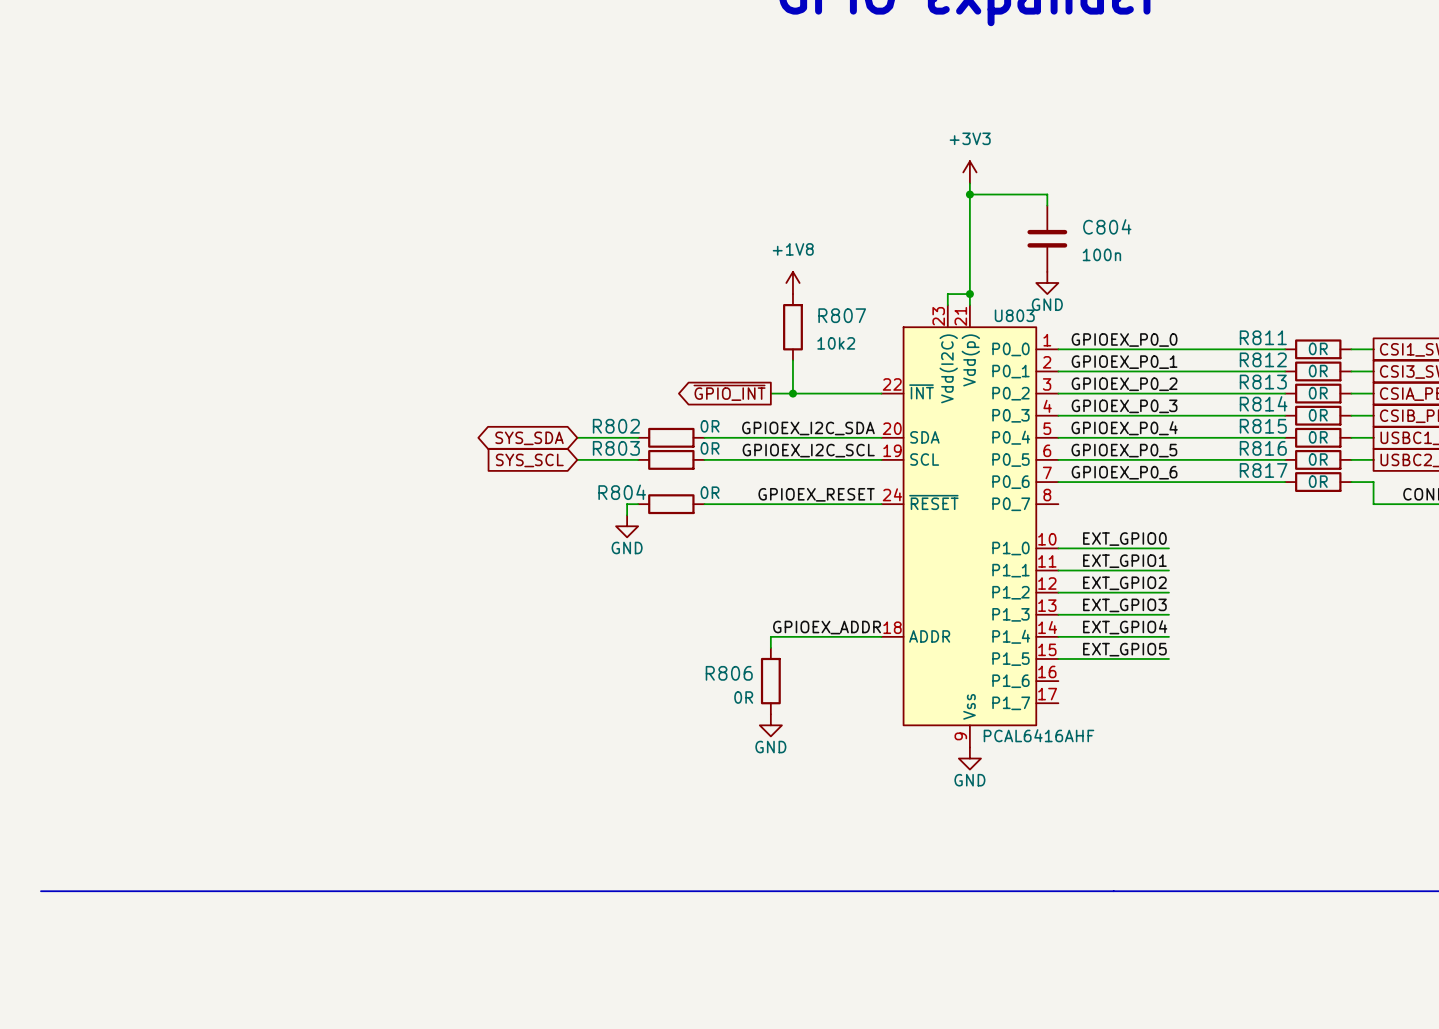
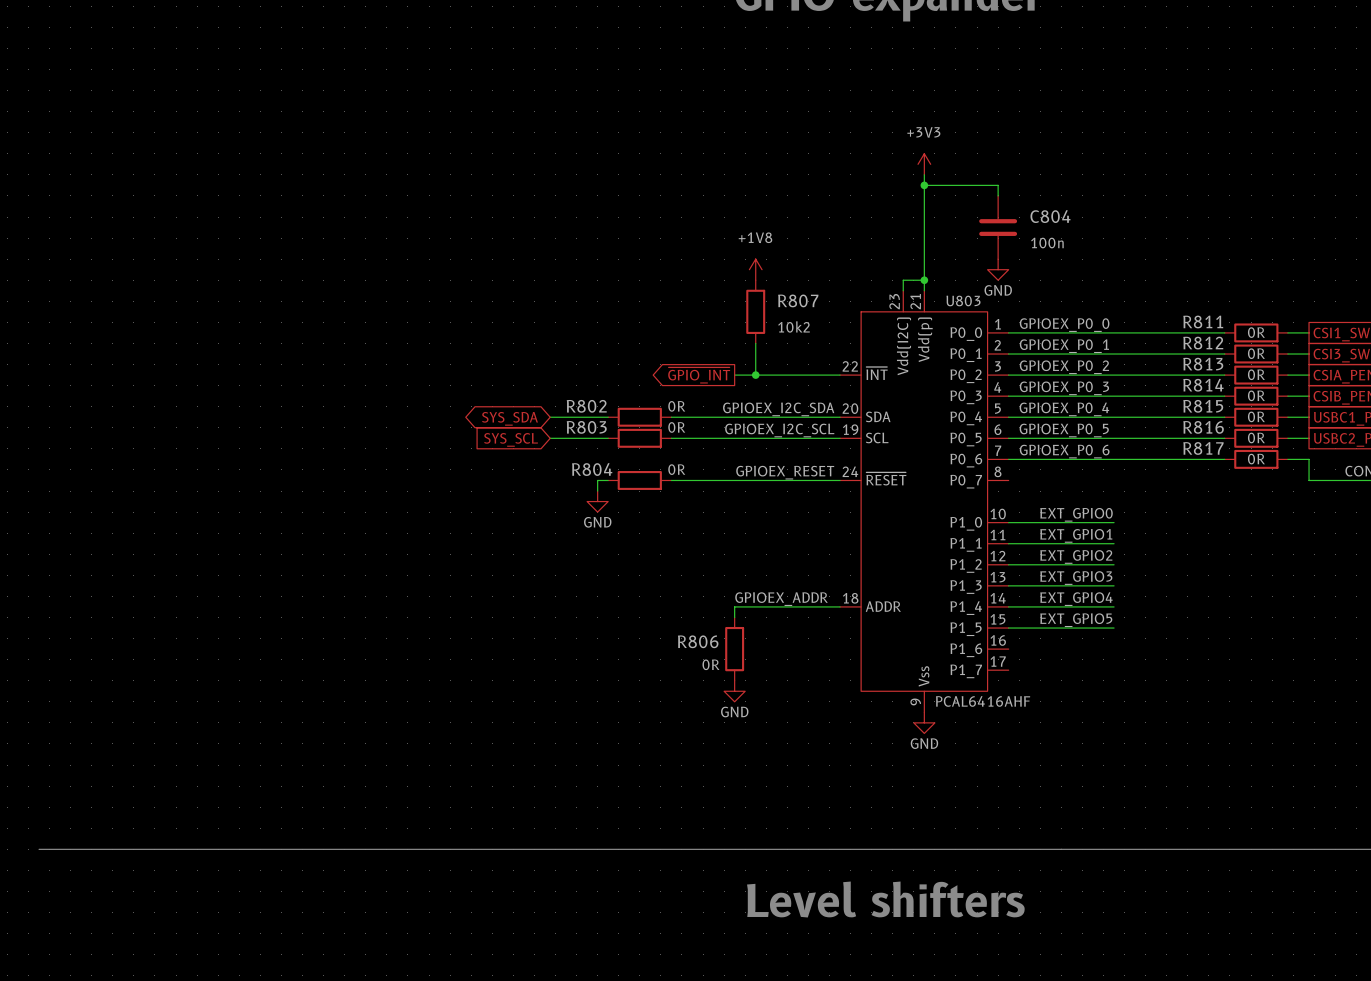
text: none -> Level shifters (885, 899)

